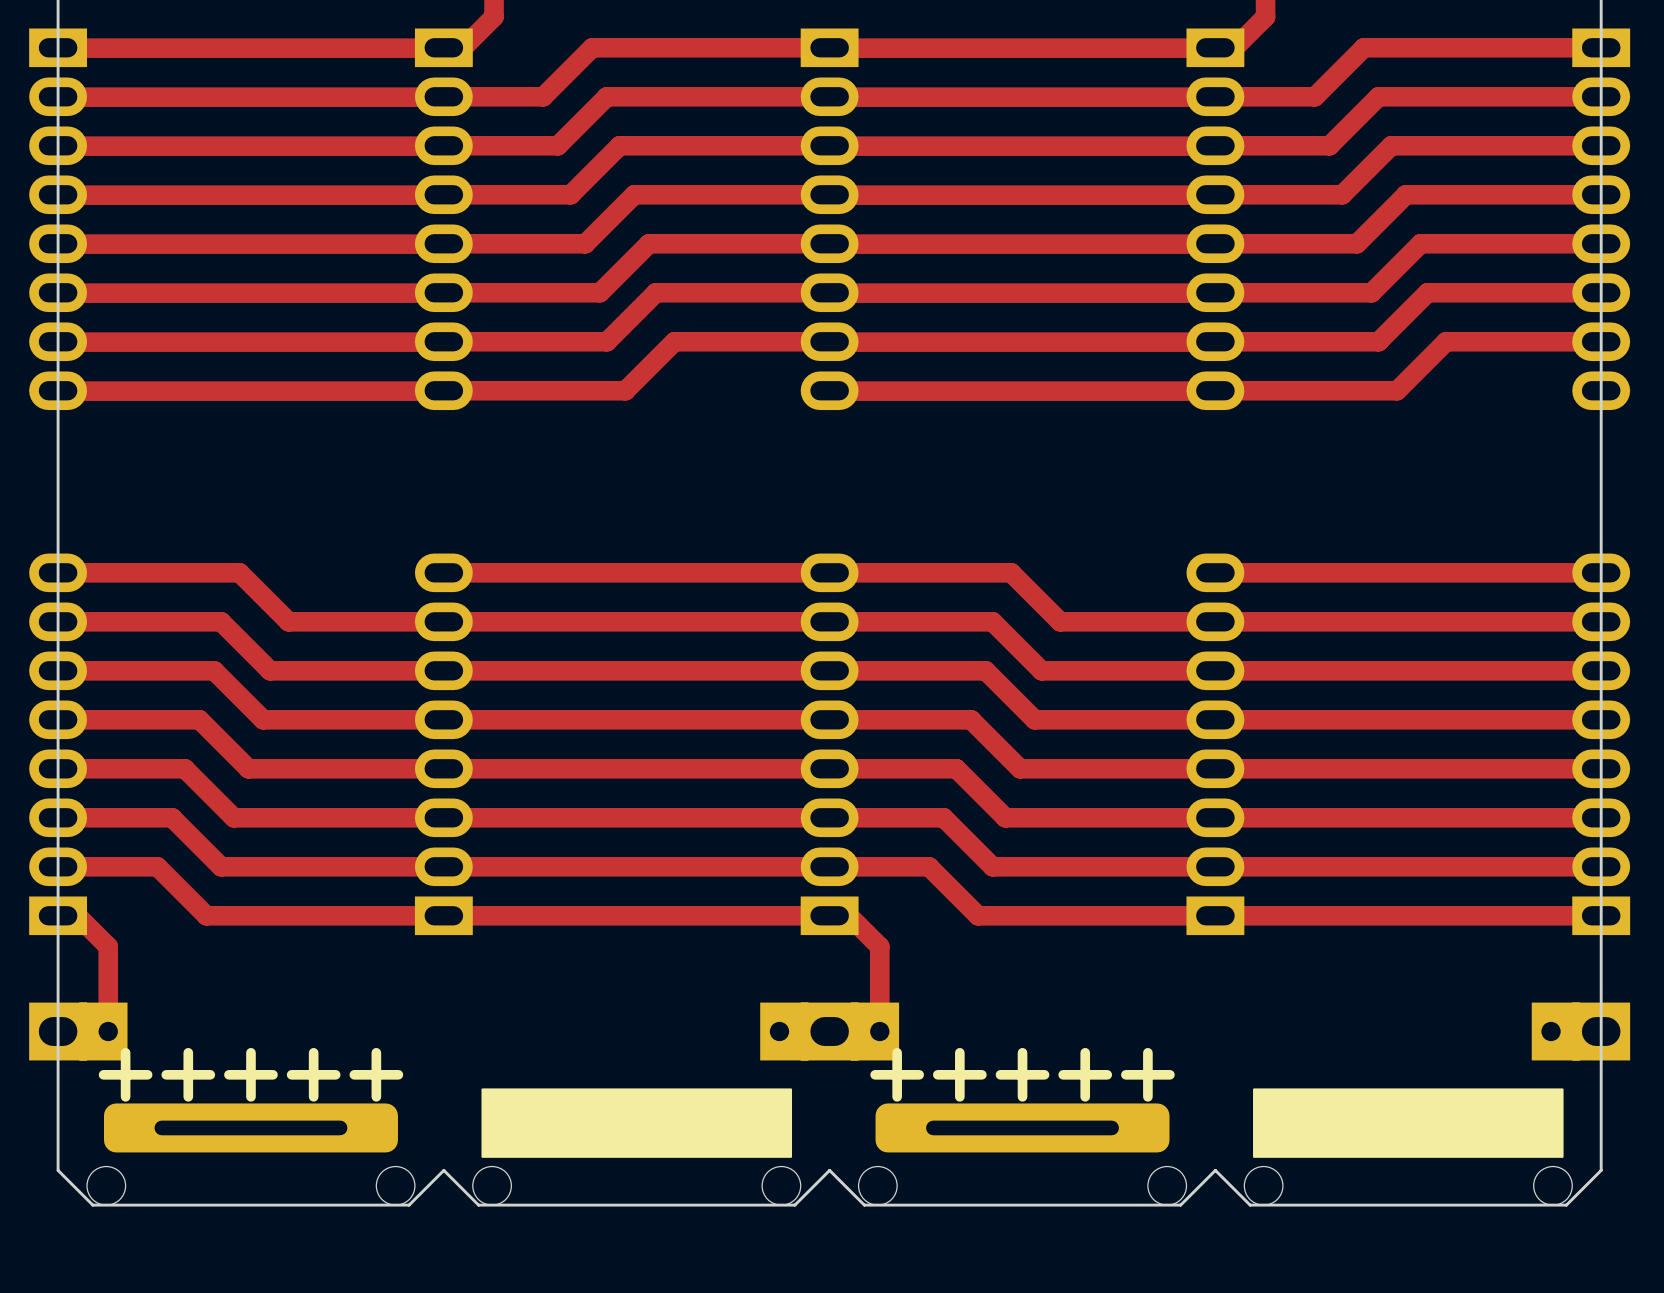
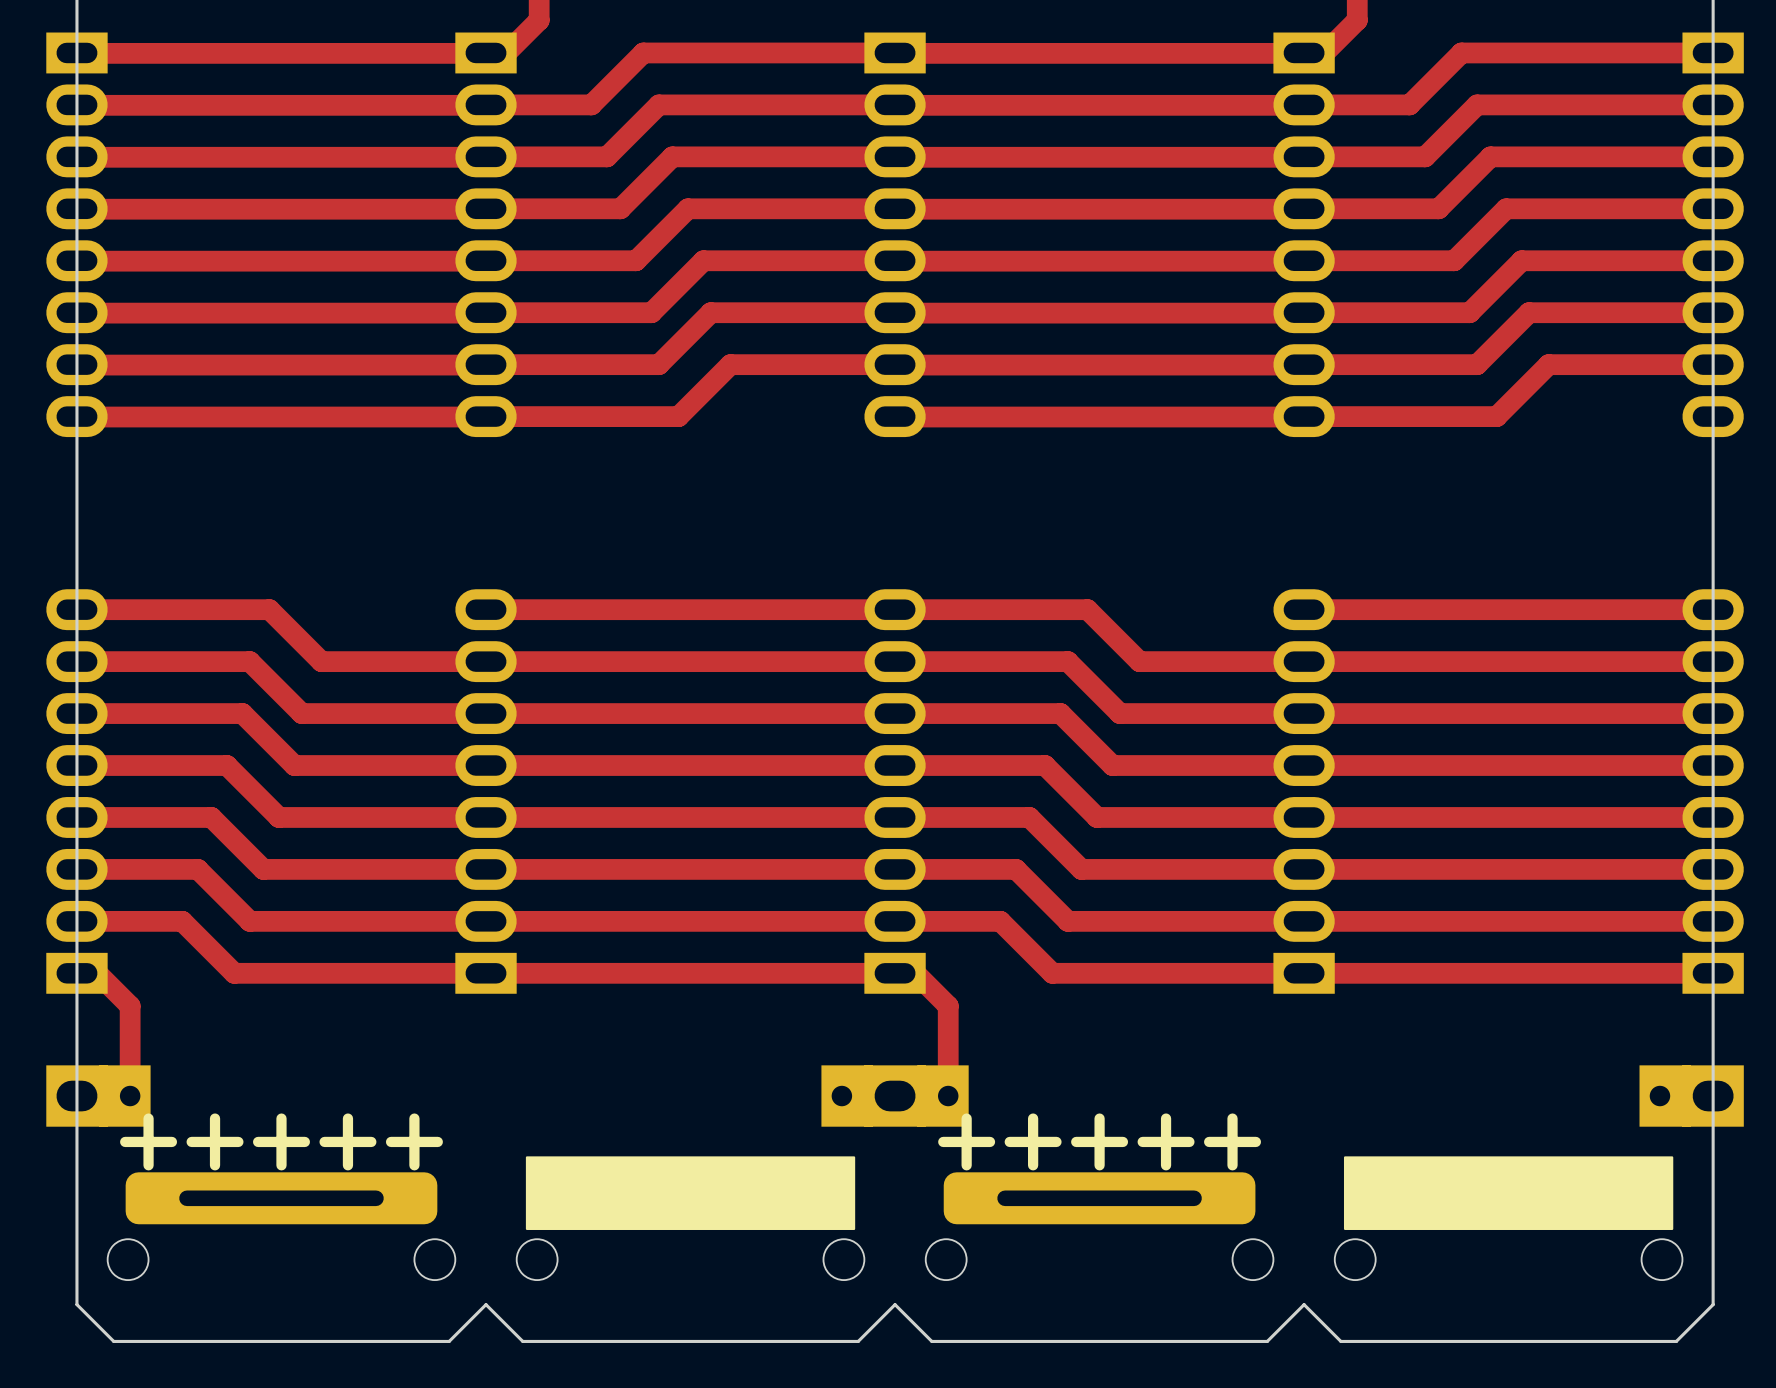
board edge: (1601, 1170) (1566, 1205) (1250, 1205) (1215, 1170) (1180, 1205) (864, 1205) (829, 1170) (794, 1205) (478, 1205) (443, 1170) (409, 1205) (92, 1205) (58, 1170) -> (1713, 1243) (1713, 1304) (1676, 1341) (1340, 1341) (1304, 1304) (1267, 1341) (931, 1341) (895, 1304) (858, 1341) (522, 1341) (486, 1304) (449, 1341) (113, 1341) (76, 1304) (76, 1243)

